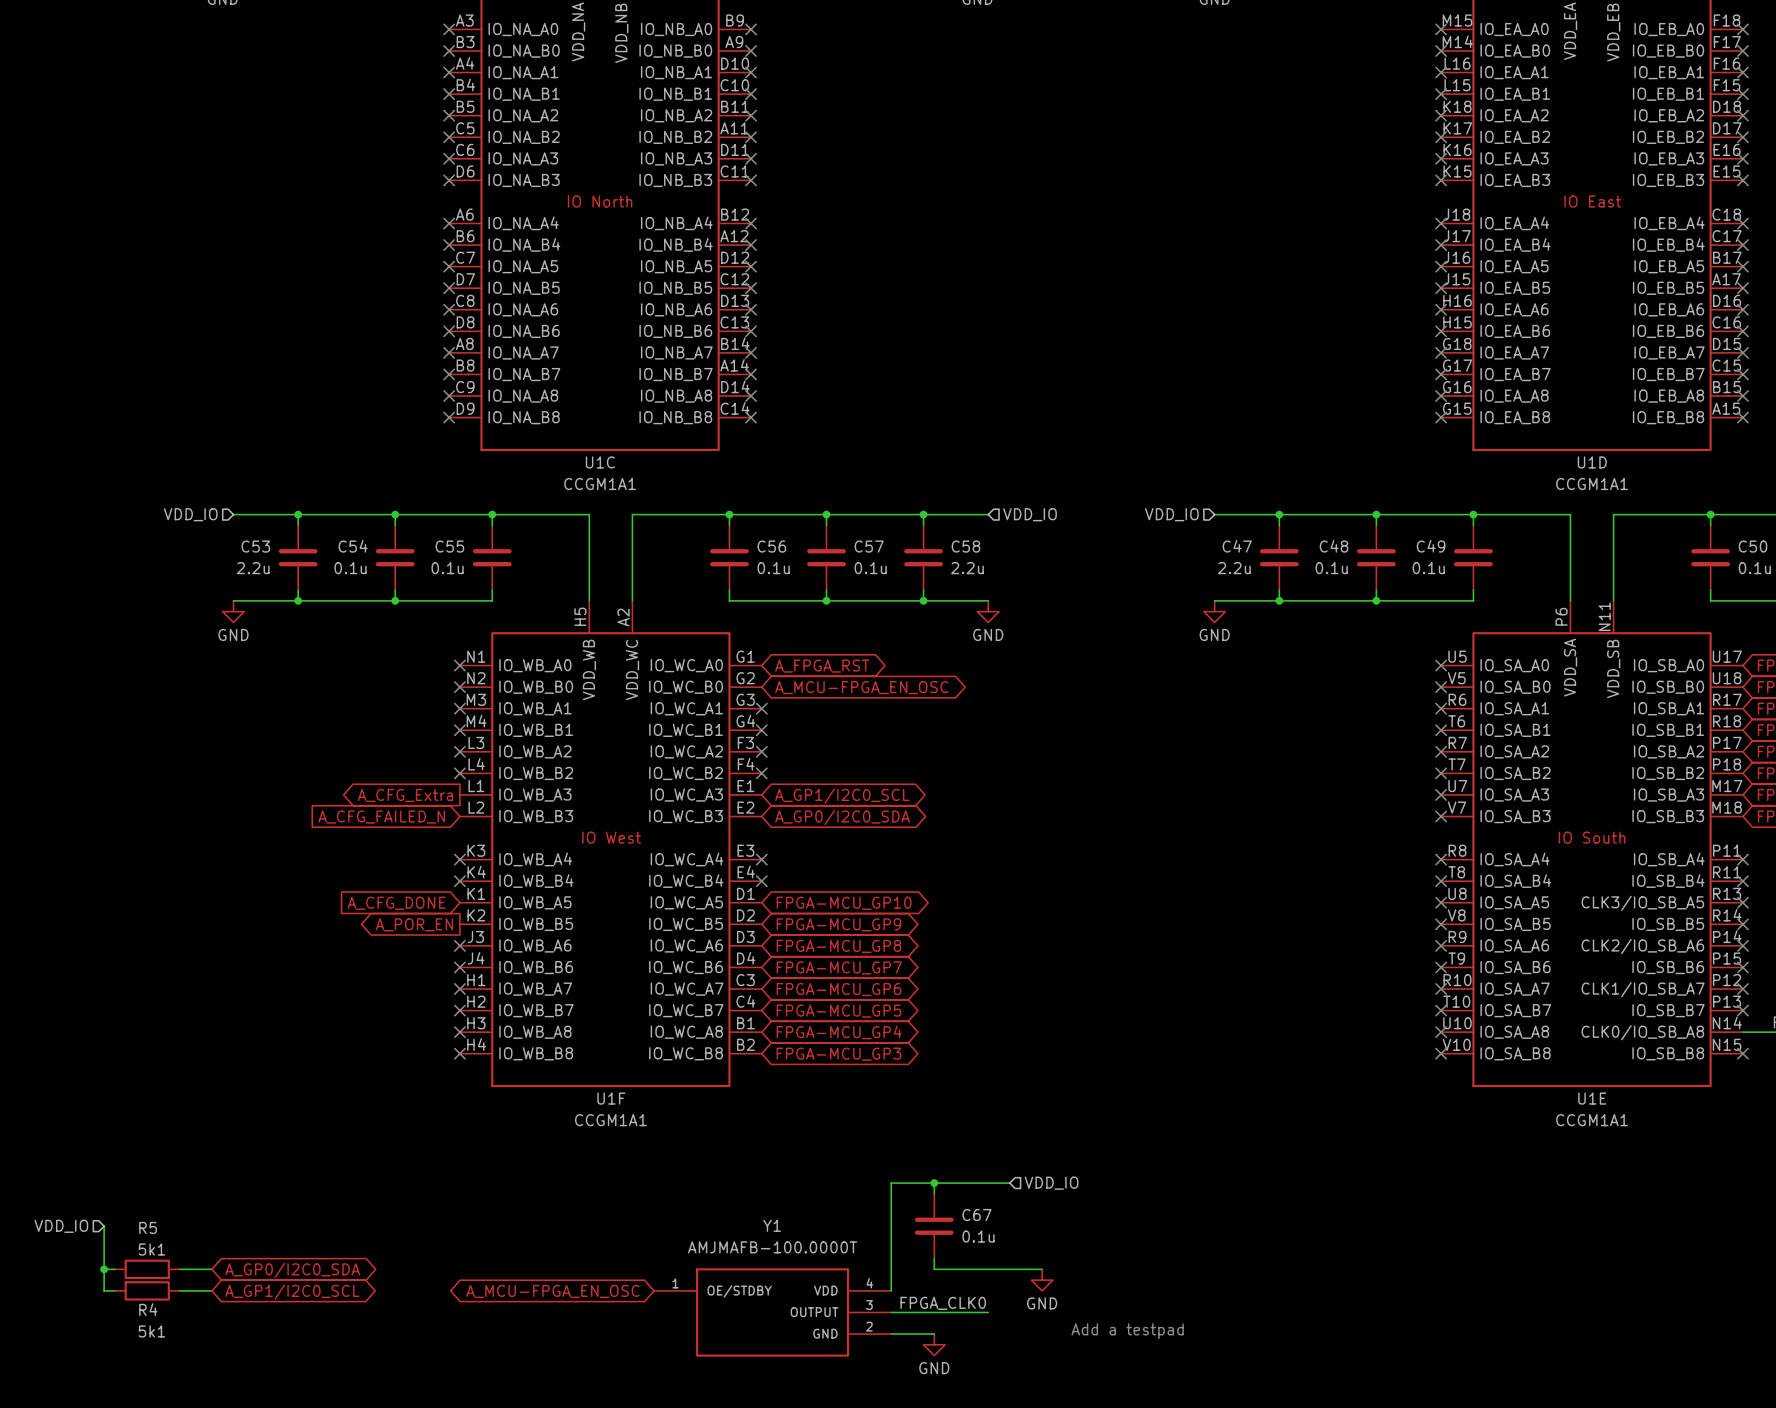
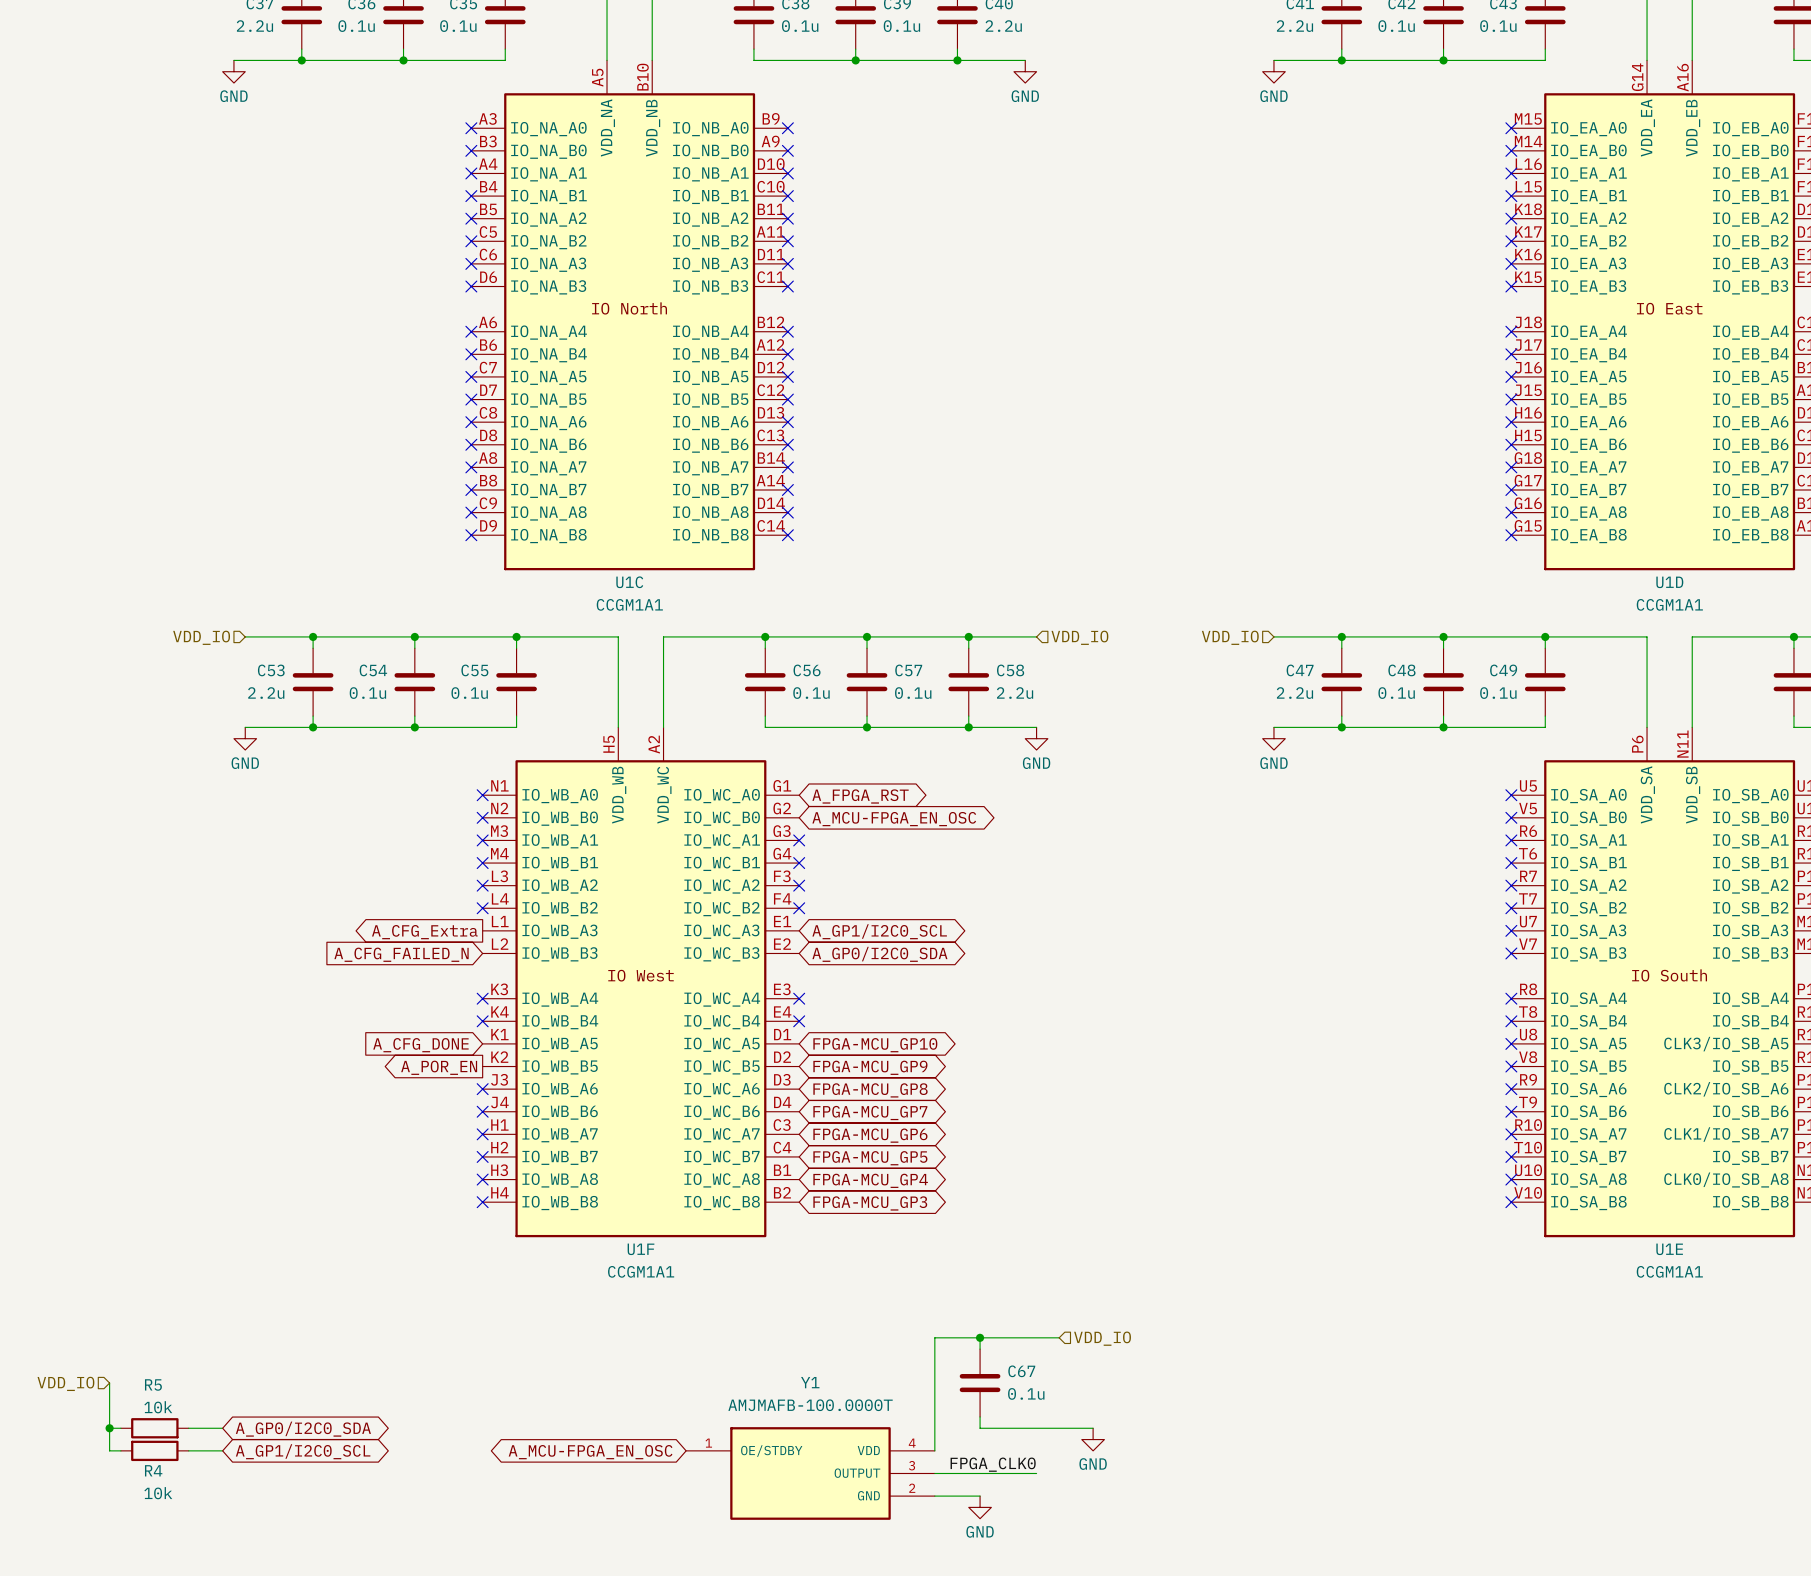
R5 value: 5k1 (151, 1249) -> 10k (158, 1407)
R4 value: 5k1 (151, 1331) -> 10k (158, 1493)
text: Add a testpad (1127, 1331) -> none

